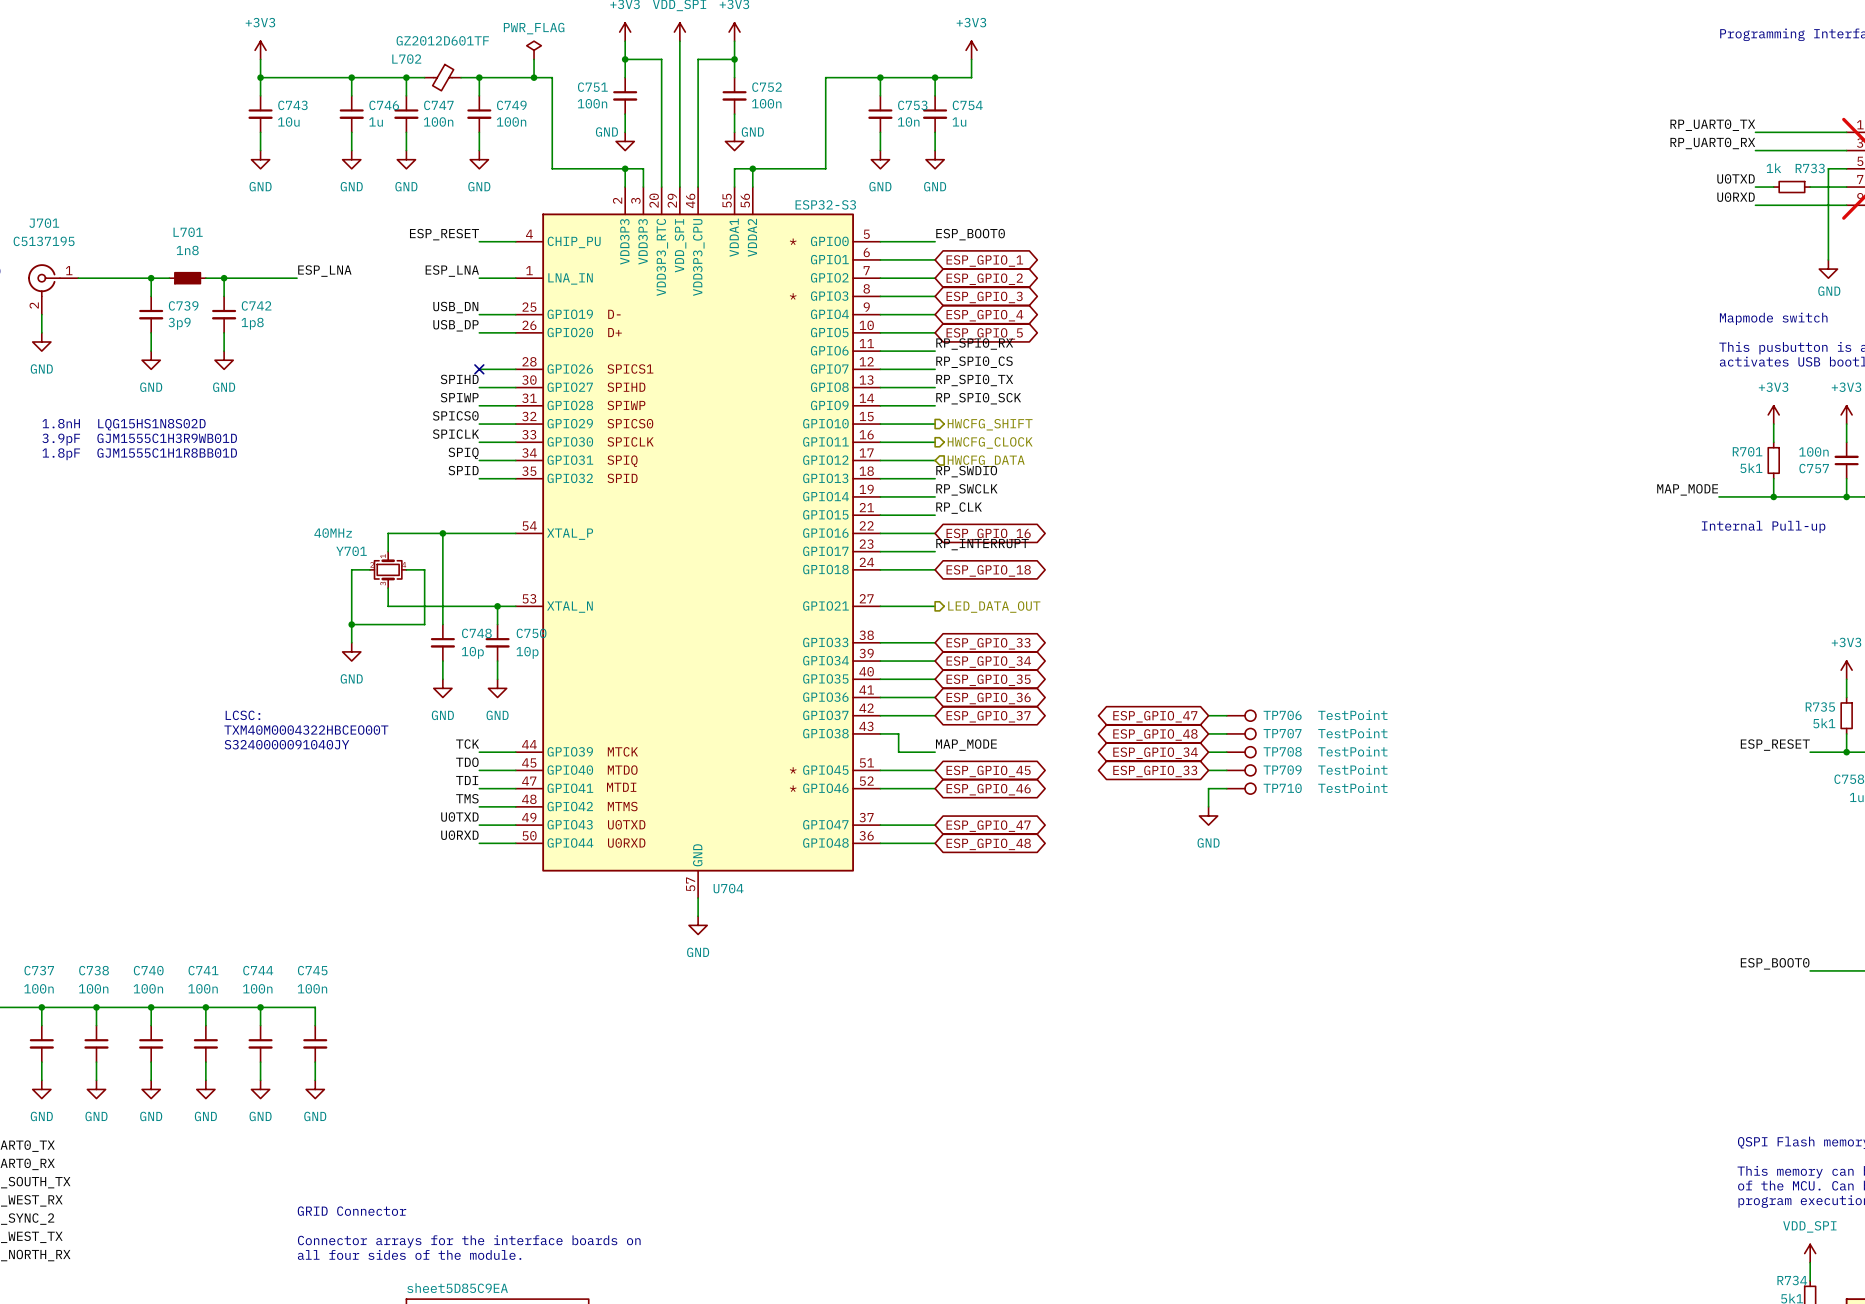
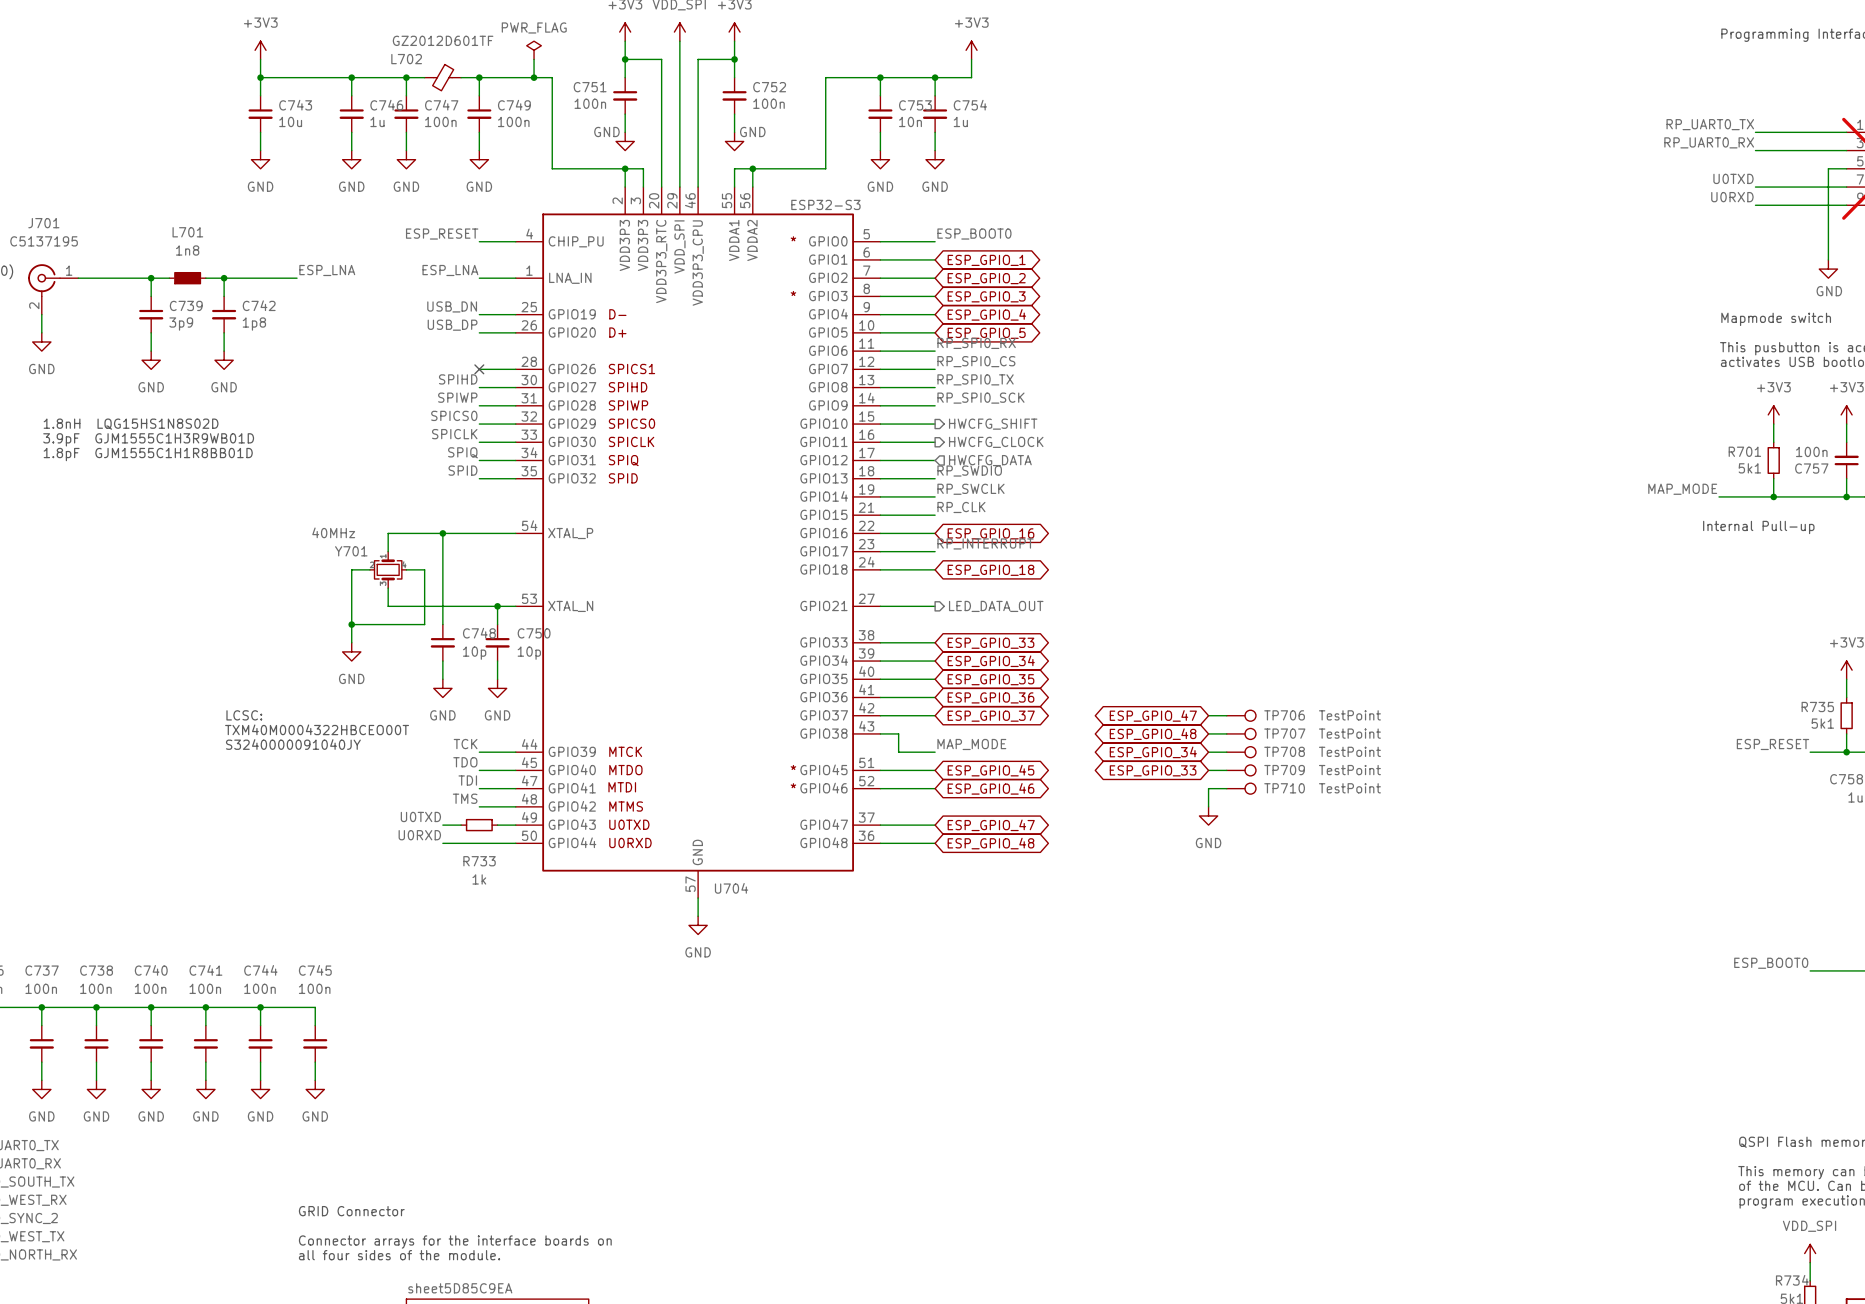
R733 value position: 1k (1773, 168) -> 1k (479, 879)
R733 name position: R733 (1810, 168) -> R733 (479, 861)
wire: none -> (1773, 187) (1810, 187)
R733 position: (1791, 187) -> (479, 825)
label position: U0TXD (459, 816) -> U0TXD (420, 816)
wire: (479, 825) (497, 825) -> (442, 825) (461, 825)
label position: U0RXD (459, 835) -> U0RXD (419, 835)
wire: none -> (442, 843) (479, 843)

